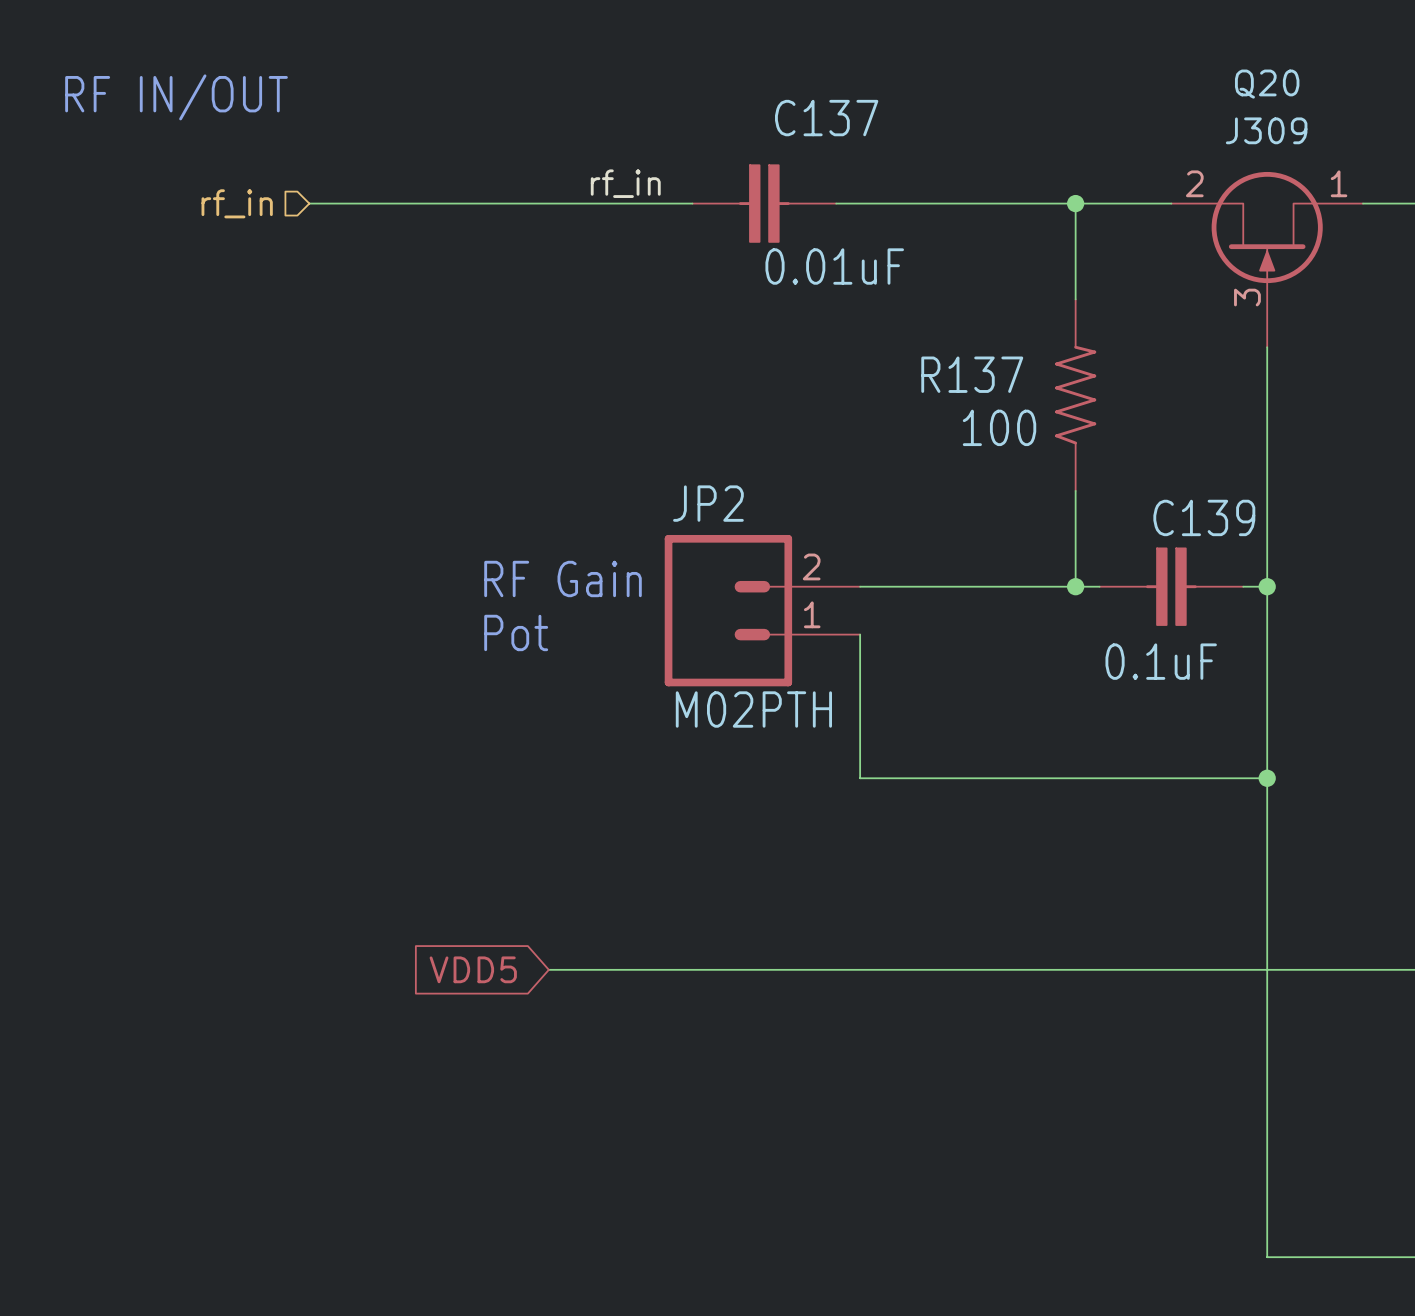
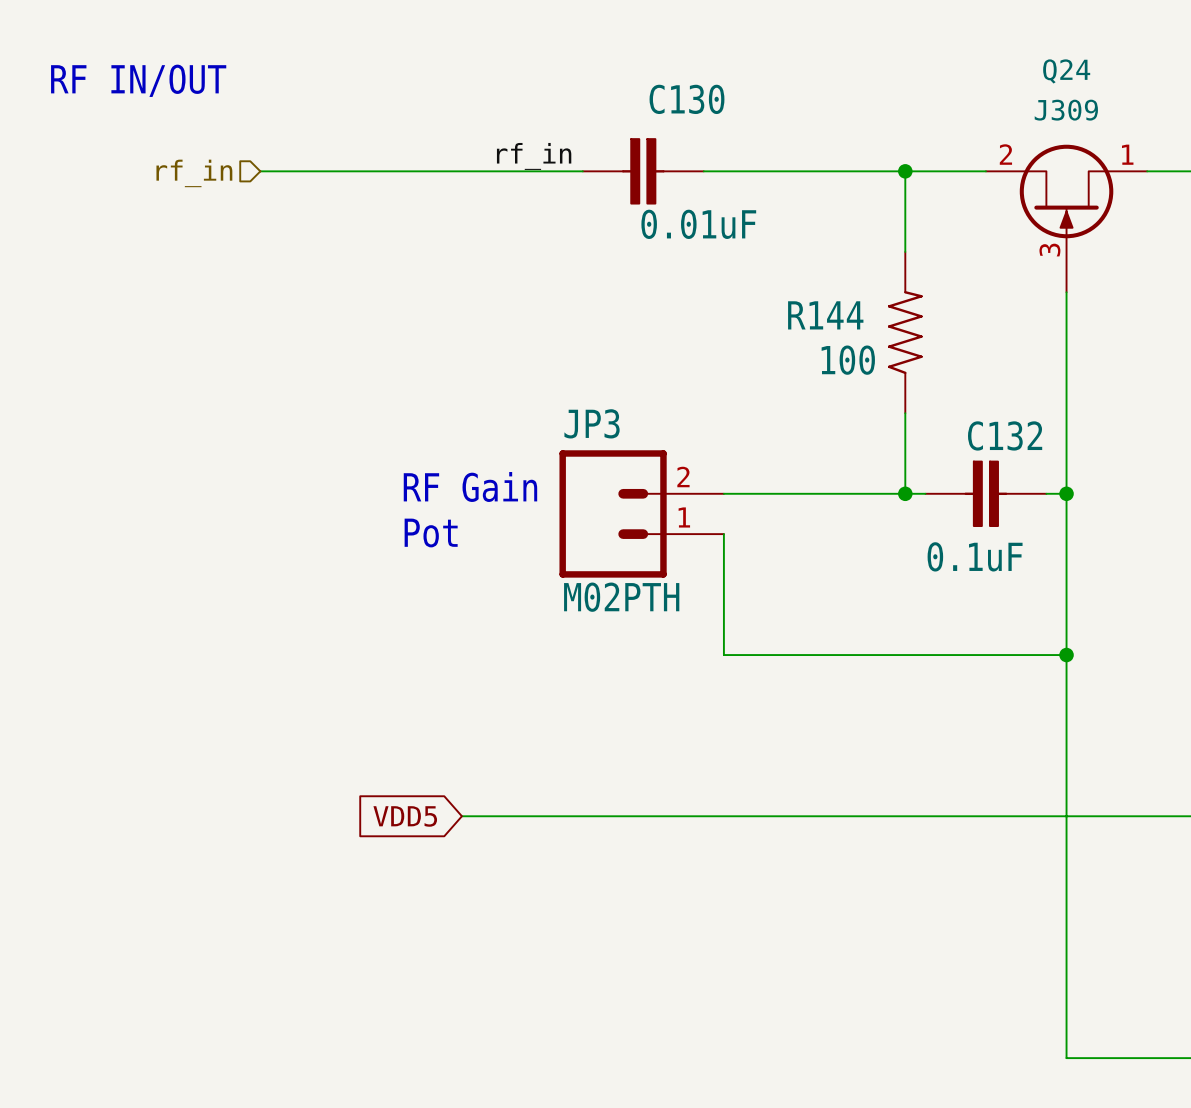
Q20 name: Q20 (1267, 84) -> Q24 (1066, 71)
C137 name: C137 (826, 118) -> C130 (686, 99)
R137 name: R137 (972, 374) -> R144 (825, 315)
JP2 name: JP2 (708, 503) -> JP3 (592, 423)
C139 name: C139 (1204, 517) -> C132 (1005, 435)

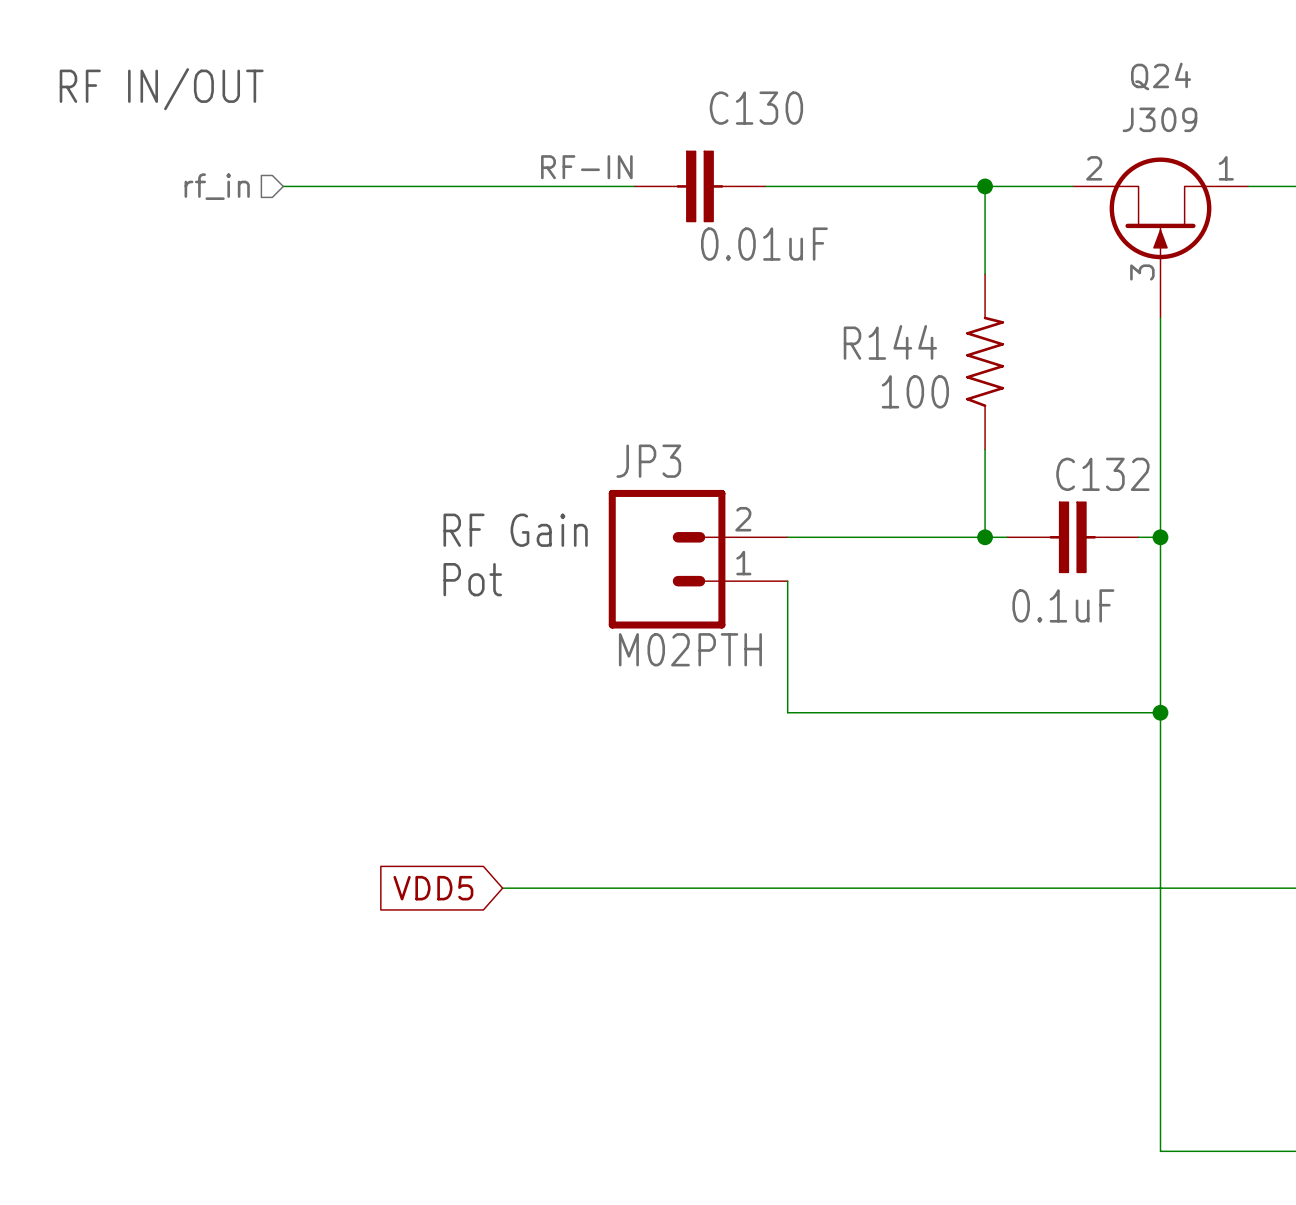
label: rf_in (534, 156) -> RF-IN (586, 167)

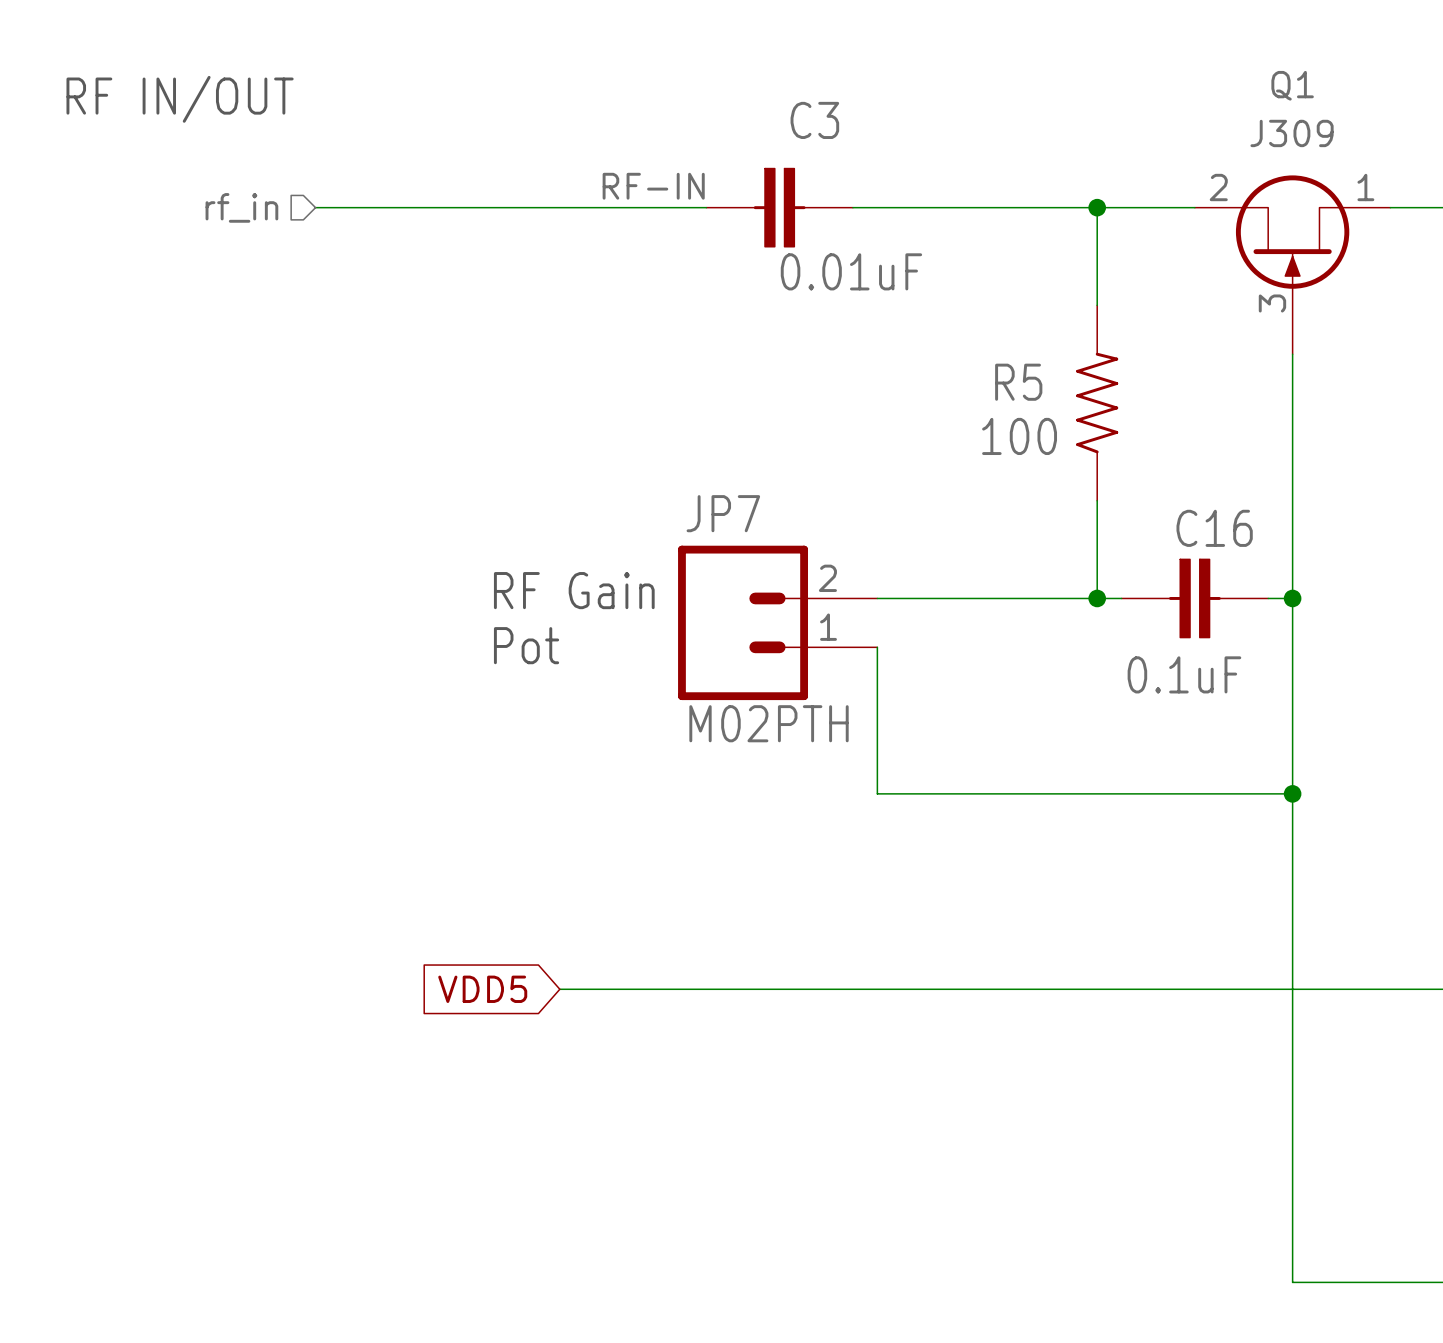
Q24 name: Q24 (1161, 76) -> Q1 (1292, 85)
C130 name: C130 (756, 108) -> C3 (814, 120)
R144 name: R144 (890, 342) -> R5 (1018, 382)
JP3 name: JP3 (648, 461) -> JP7 (723, 513)
C132 name: C132 (1102, 474) -> C16 (1214, 528)

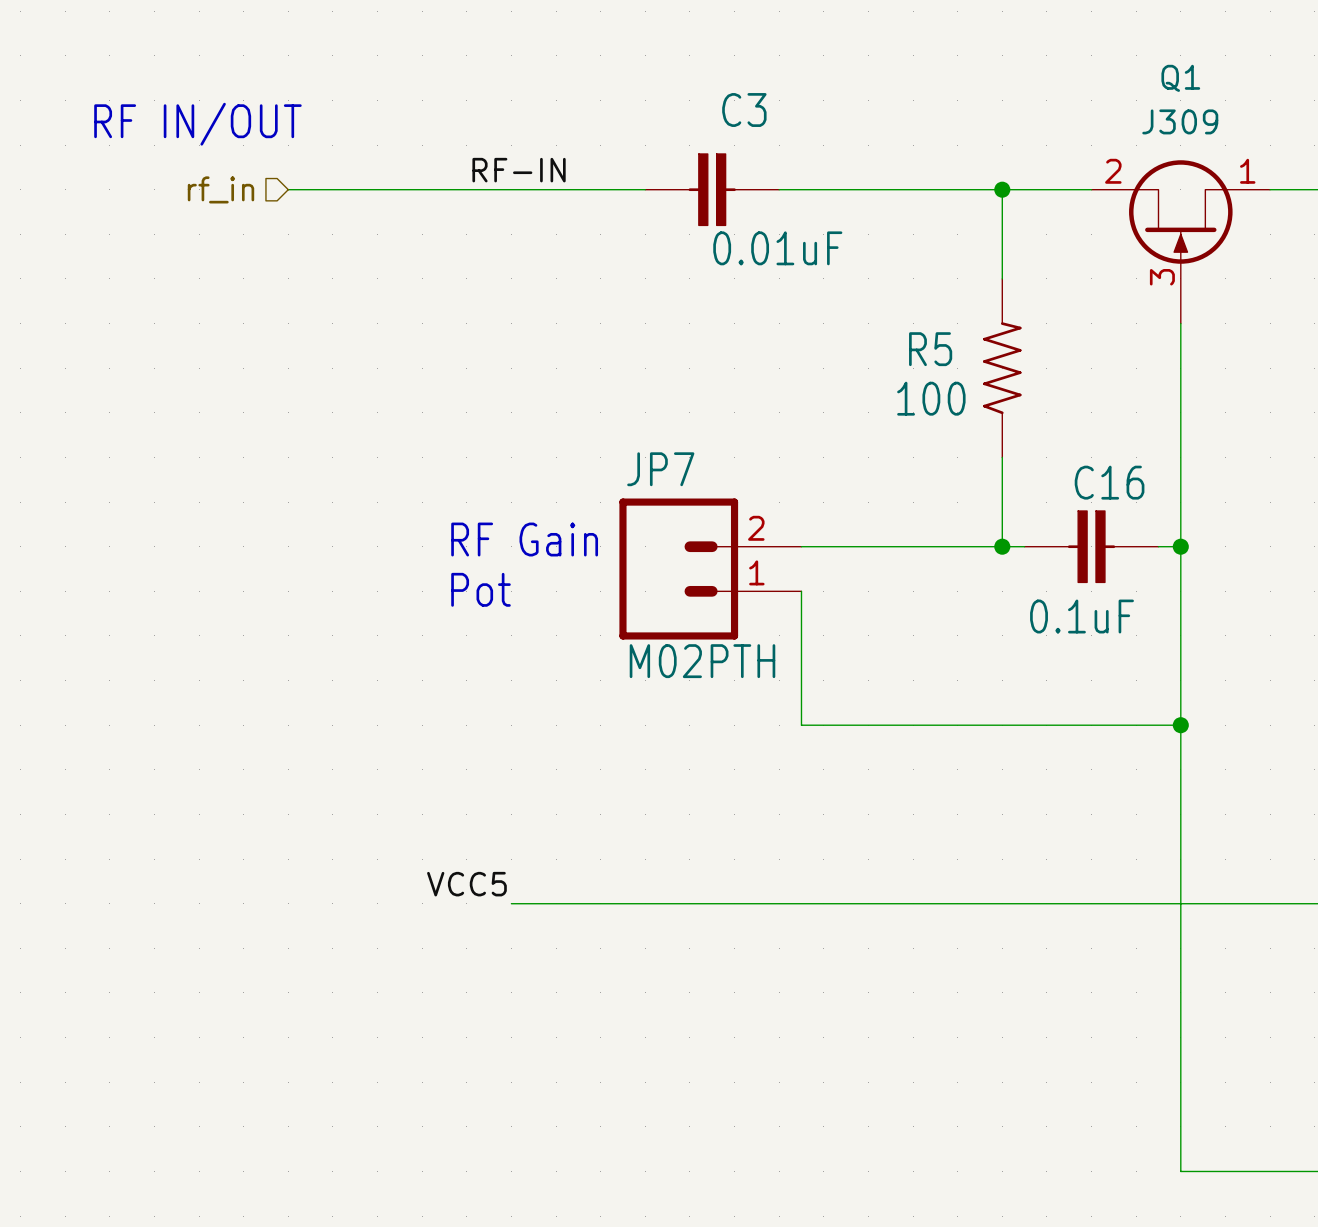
text position: RF IN/OUT (180, 99) -> RF IN/OUT (197, 124)
label position: RF-IN (653, 186) -> RF-IN (519, 170)
label: none -> VCC5 (466, 884)
global label: VDD5 (482, 989) -> none

